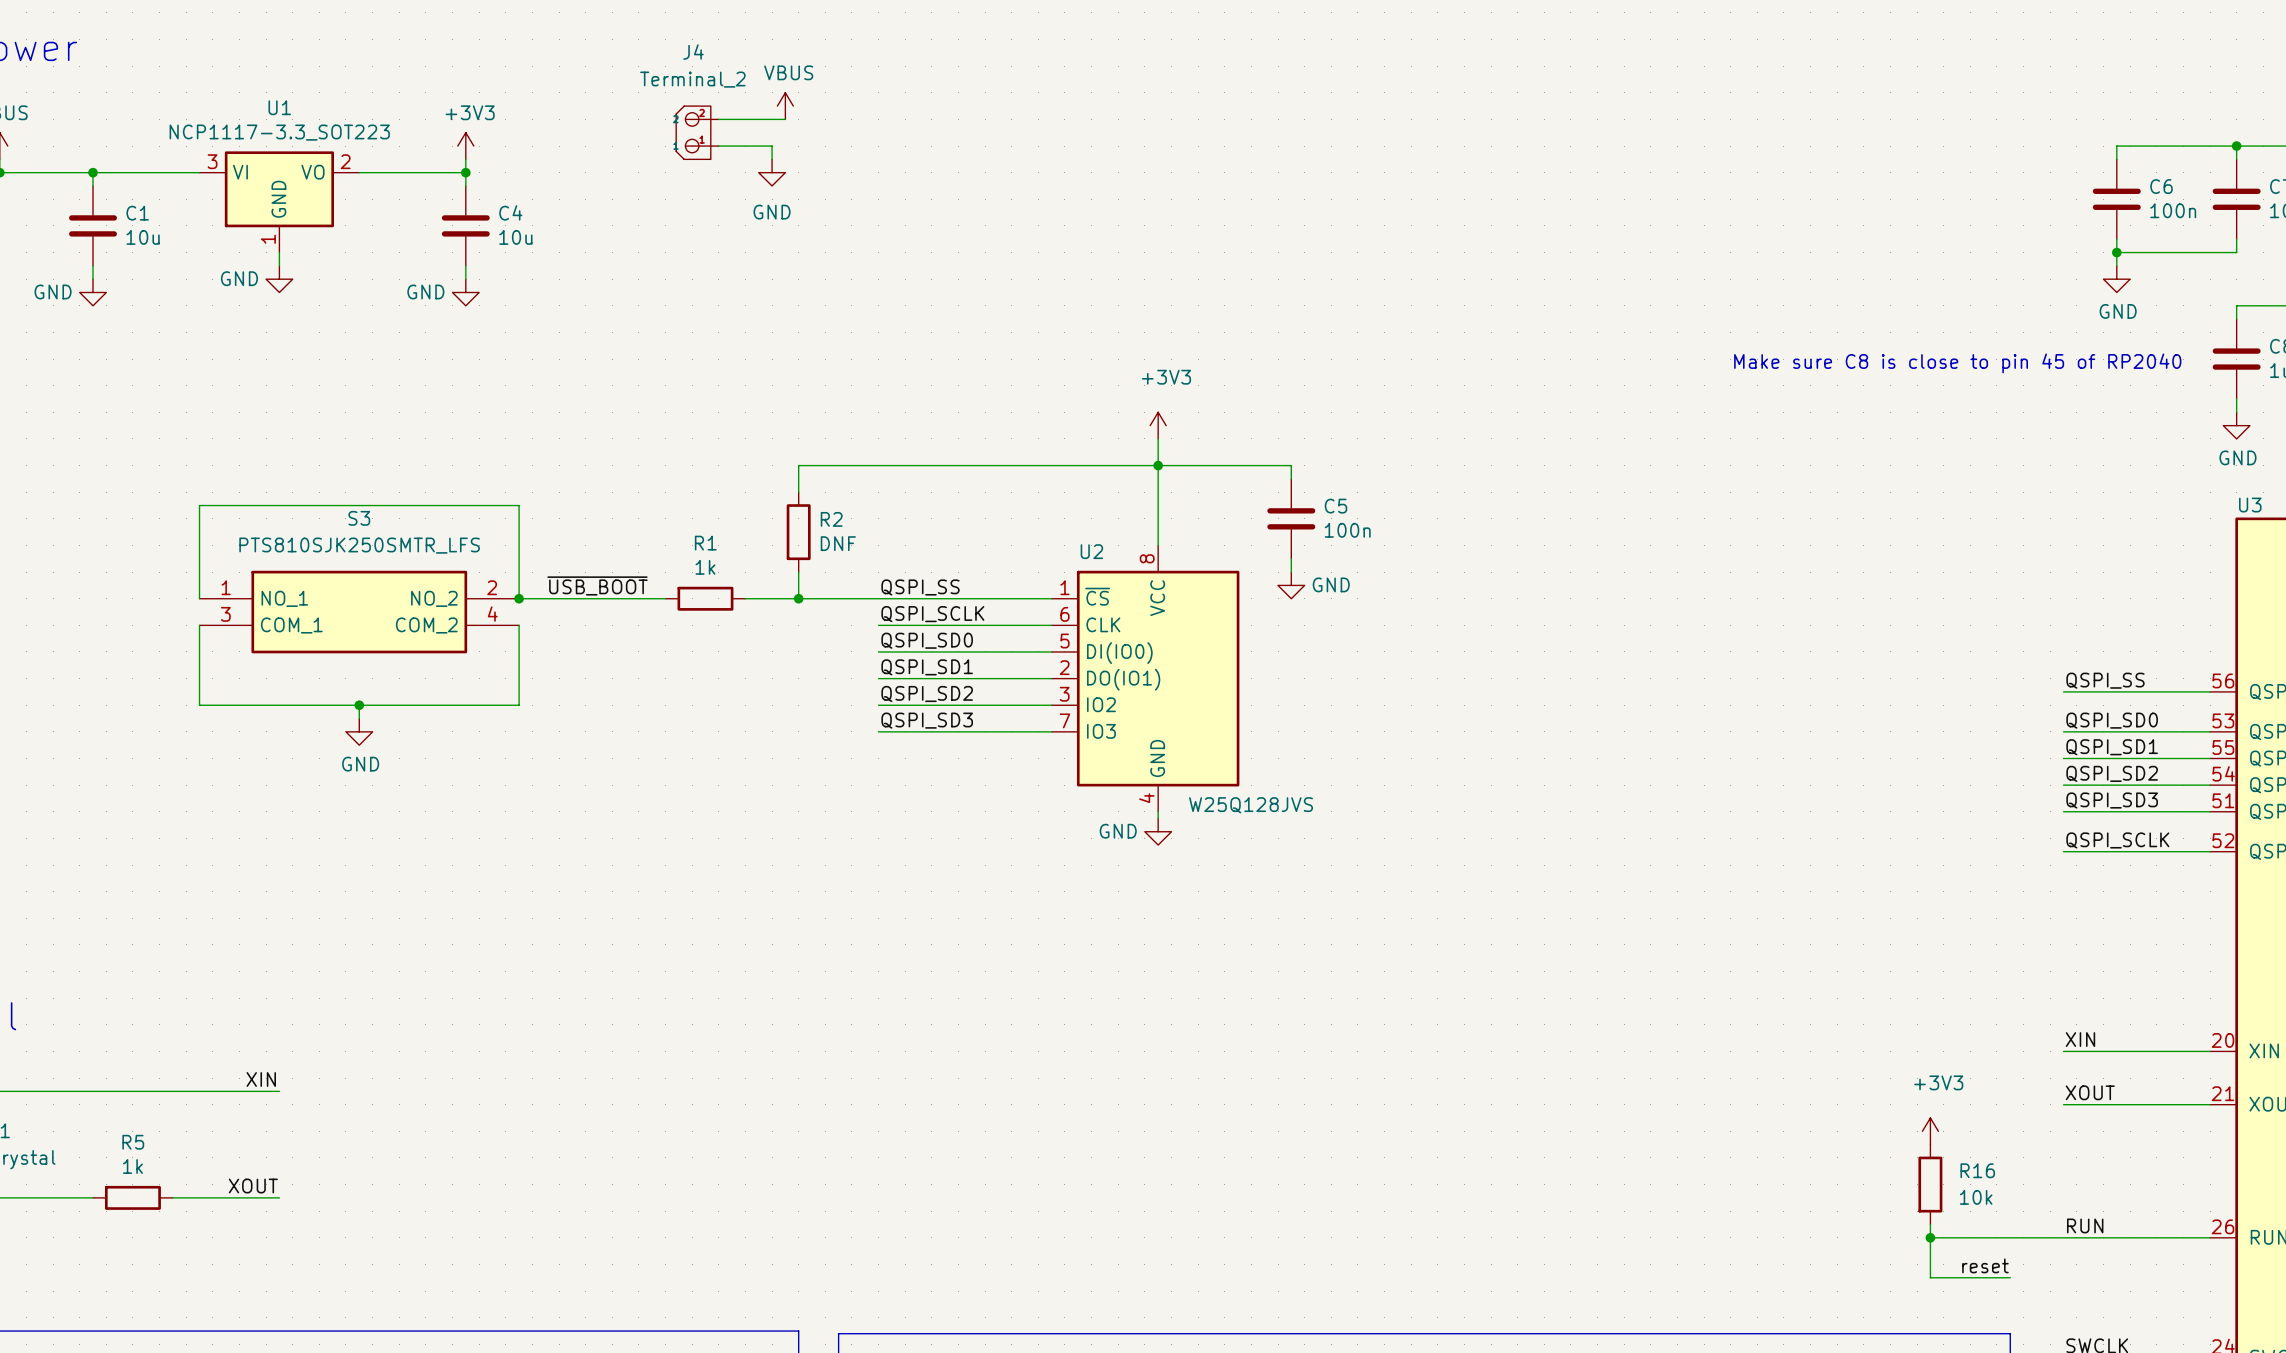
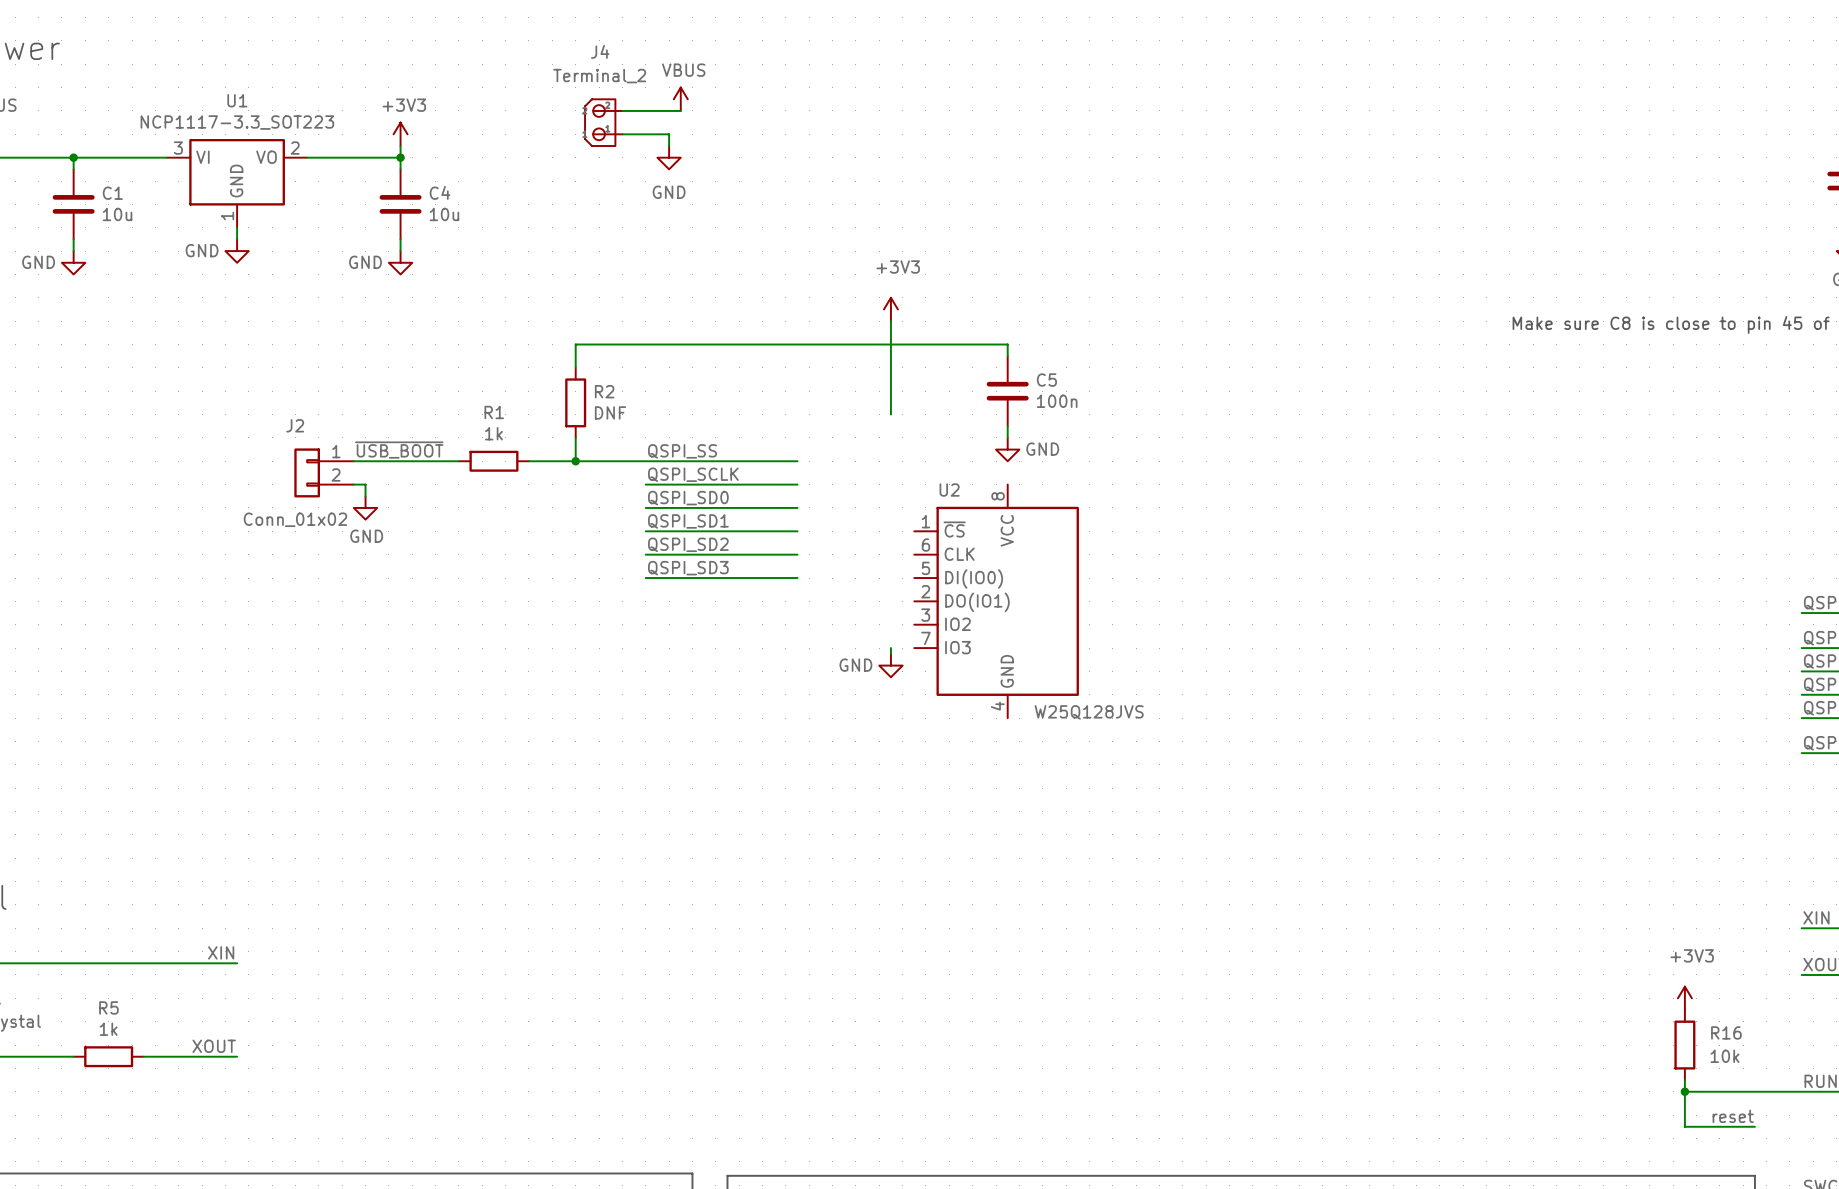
wire: none -> (890, 321) (890, 414)
power symbol position: +3V3 (1158, 425) -> +3V3 (890, 309)
junction: (1158, 465) -> none
wire: (1291, 478) (1291, 465) (798, 465) (798, 492) -> (1007, 356) (1007, 344) (575, 344) (575, 367)
wire: (1158, 492) (1158, 545) -> none
wire: none -> (353, 461) (458, 461)
wire: none -> (528, 461) (797, 461)
junction: none -> (575, 461)
C5 position: (1291, 518) -> (1007, 391)
J2: none -> Conn_01x02 (324, 472)
R2 position: (798, 532) -> (575, 402)
wire: none -> (353, 484) (365, 484) (365, 496)
wire: (1291, 558) (1291, 572) -> none
wire: (798, 572) (798, 598) -> (575, 437) (575, 461)
label position: ~{USB_BOOT} (597, 585) -> ~{USB_BOOT} (399, 450)
power symbol position: GND (1291, 585) -> GND (1007, 449)
label position: QSPI_SS (920, 587) -> QSPI_SS (682, 451)
wire: (199, 598) (199, 505) (519, 505) (519, 598) (665, 598) -> none
junction: (519, 598) -> none
R1 position: (705, 598) -> (493, 461)
junction: (798, 598) -> none
wire: (918, 598) (1051, 598) -> none
S3: PTS810SJK250SMTR_LFS (359, 612) -> none
label position: QSPI_SCLK (932, 614) -> QSPI_SCLK (693, 474)
wire: (199, 625) (199, 705) (519, 705) (519, 625) -> none
wire: (918, 625) (1051, 625) -> (645, 554) (762, 554)
label position: QSPI_SD0 (927, 640) -> QSPI_SD0 (688, 498)
wire: (918, 651) (1051, 651) -> (645, 578) (762, 578)
label position: QSPI_SD1 (927, 667) -> QSPI_SD1 (688, 521)
wire: (878, 678) (1051, 678) -> (645, 484) (797, 484)
label position: QSPI_SD2 (927, 694) -> QSPI_SD2 (688, 544)
wire: (359, 705) (359, 718) -> none
junction: (359, 705) -> none
wire: (878, 705) (1051, 705) -> (645, 507) (797, 507)
label position: QSPI_SD3 (927, 720) -> QSPI_SD3 (688, 568)
power symbol position: GND (359, 731) -> GND (365, 507)
wire: (878, 731) (1051, 731) -> none
wire: (1158, 811) (1158, 818) -> (890, 648) (890, 653)
power symbol position: GND (1158, 831) -> GND (890, 665)

